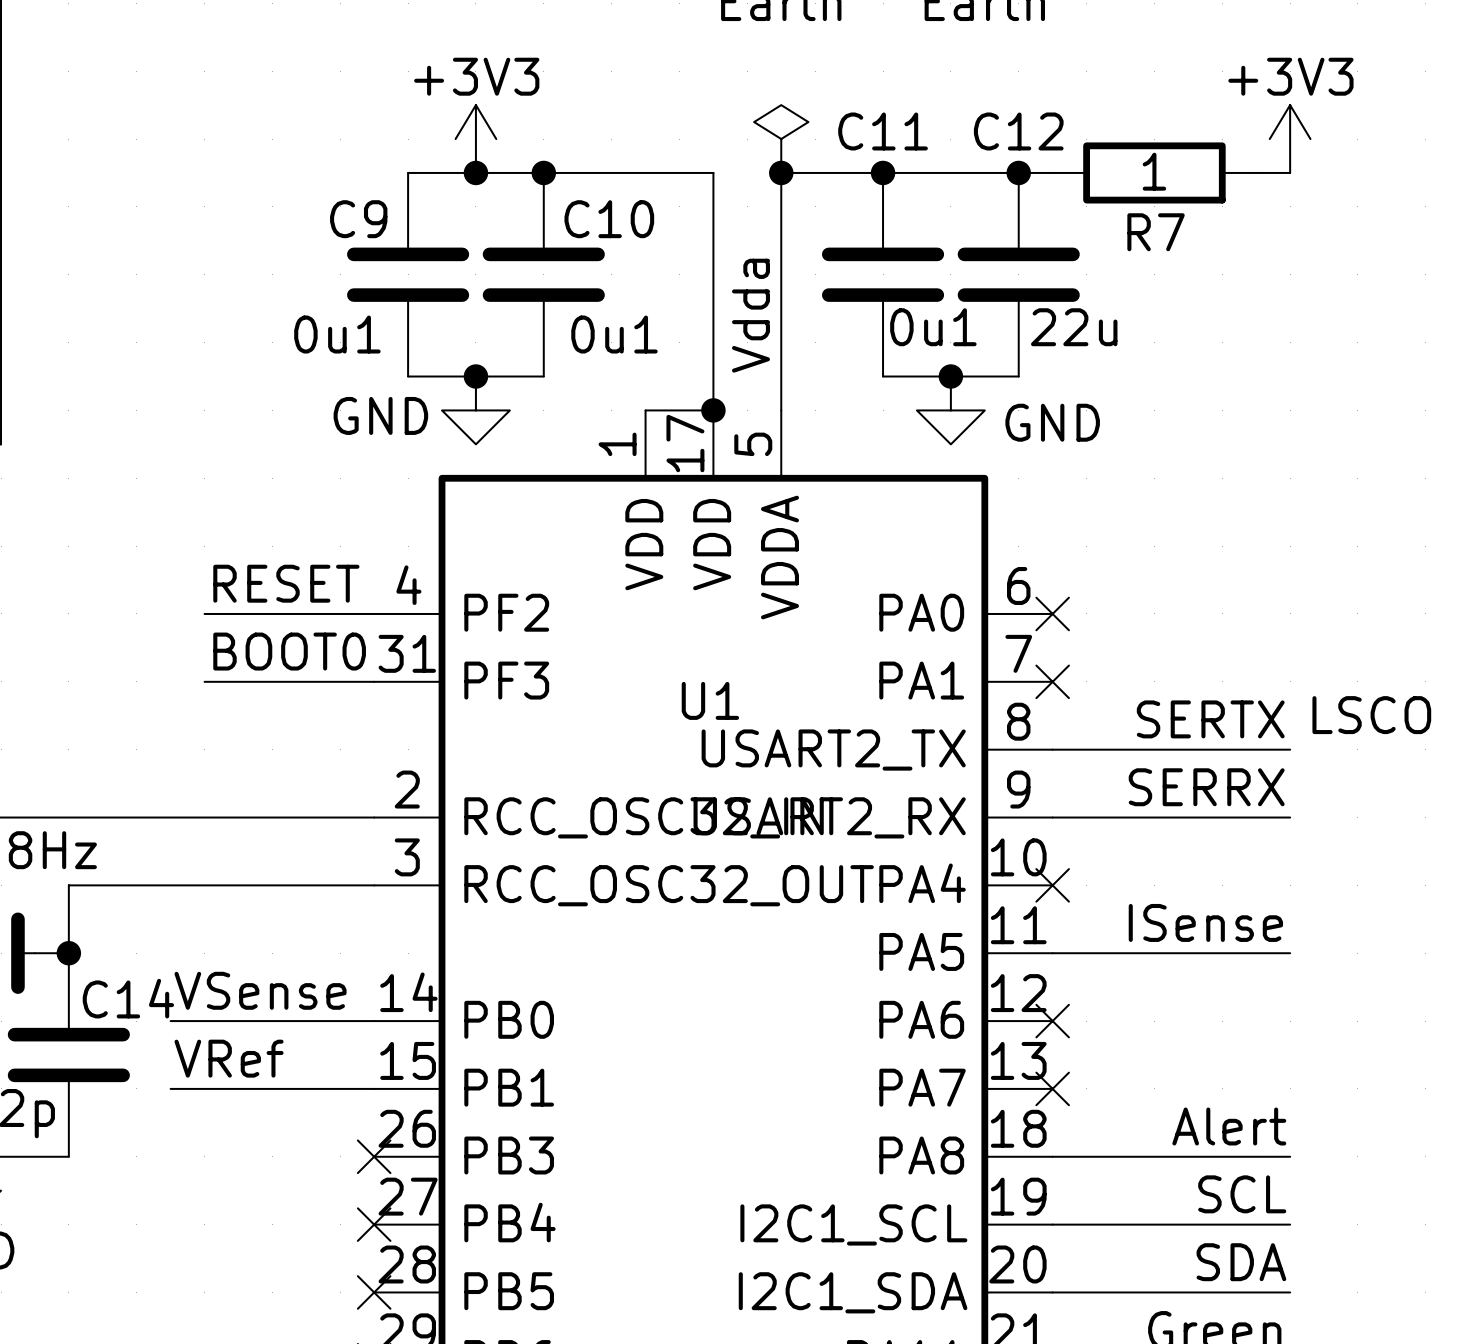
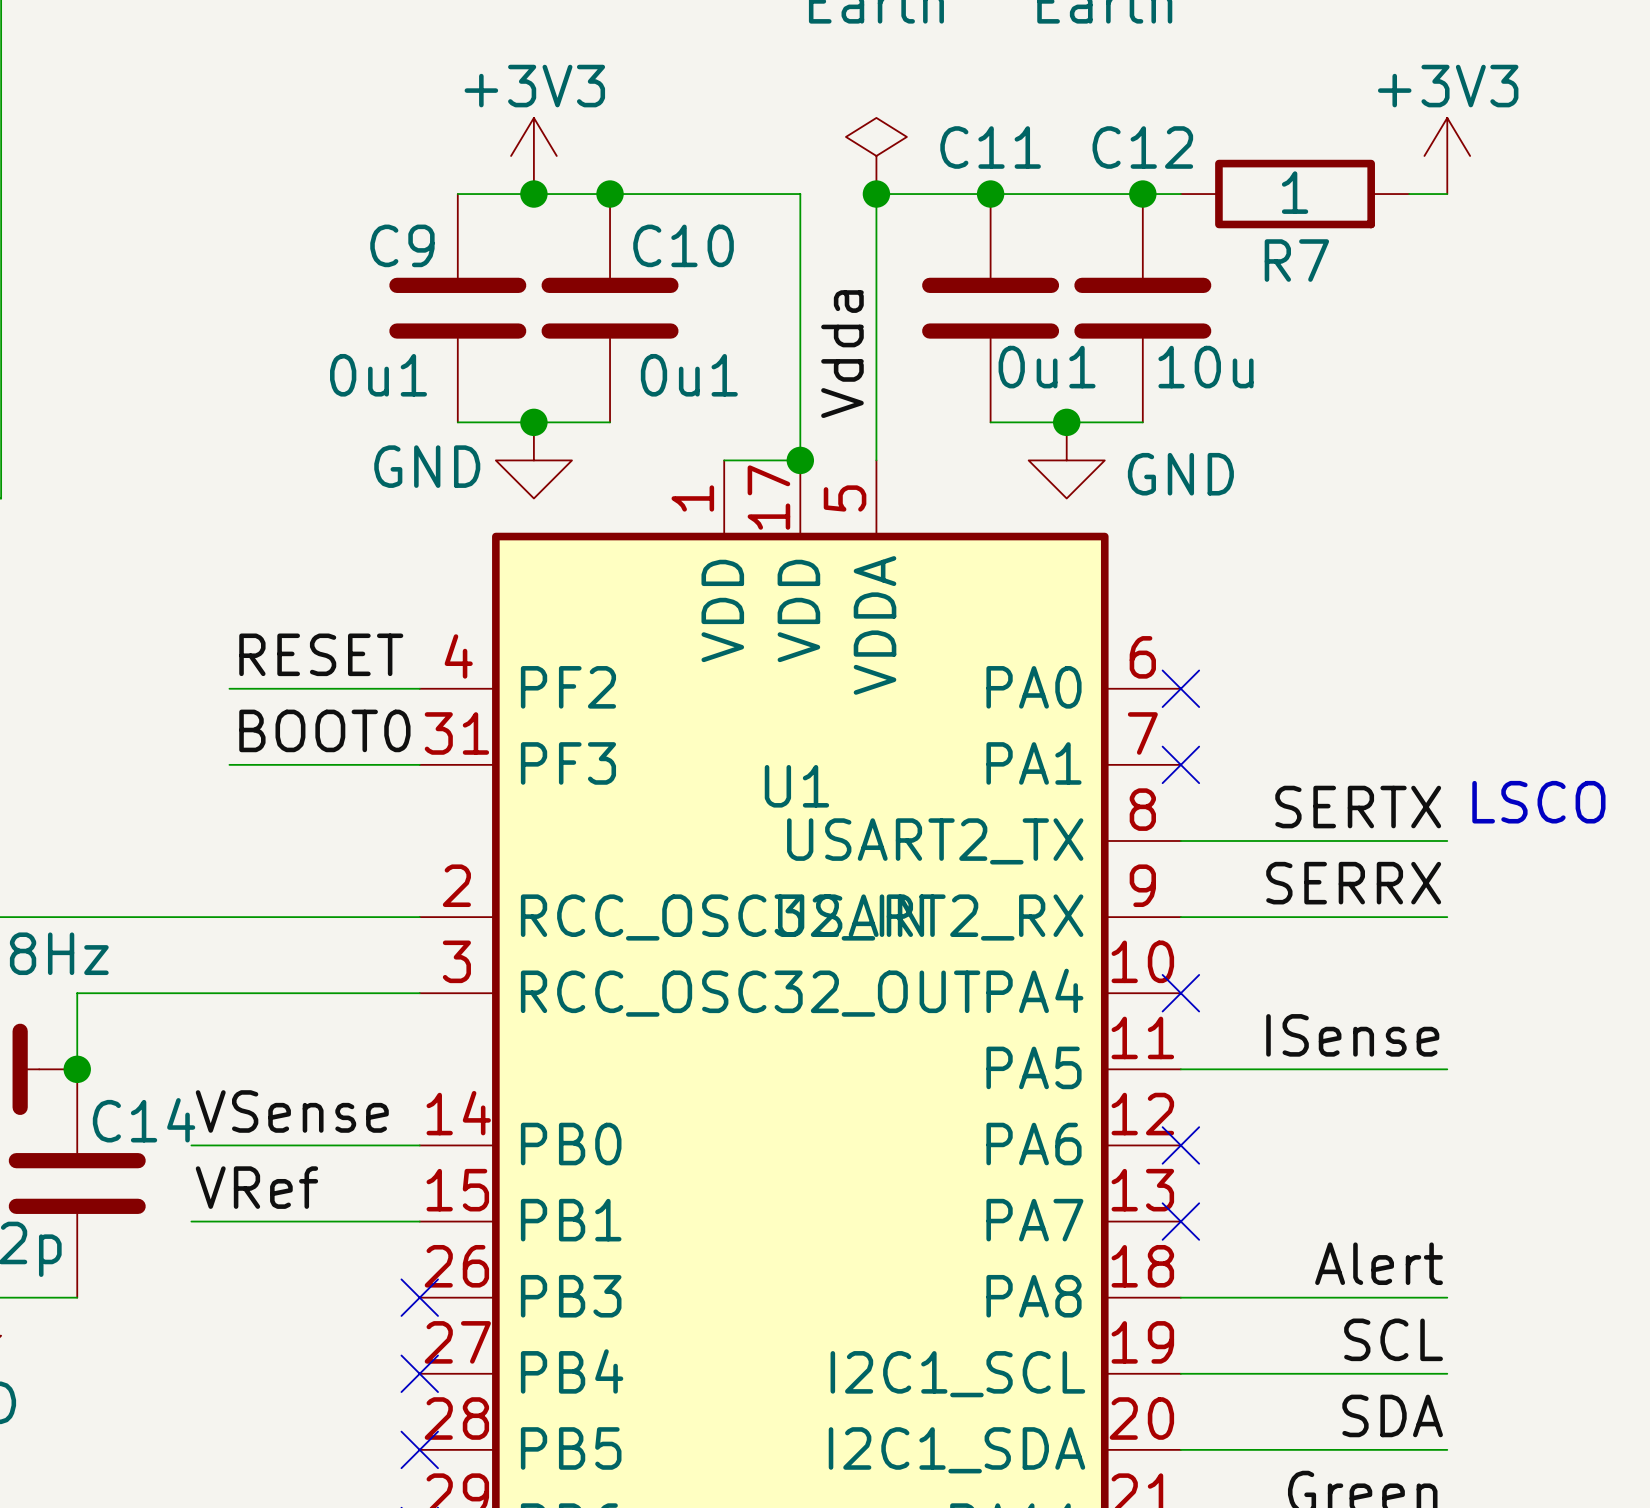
C12 value: 22u (1074, 327) -> 10u (1205, 367)

